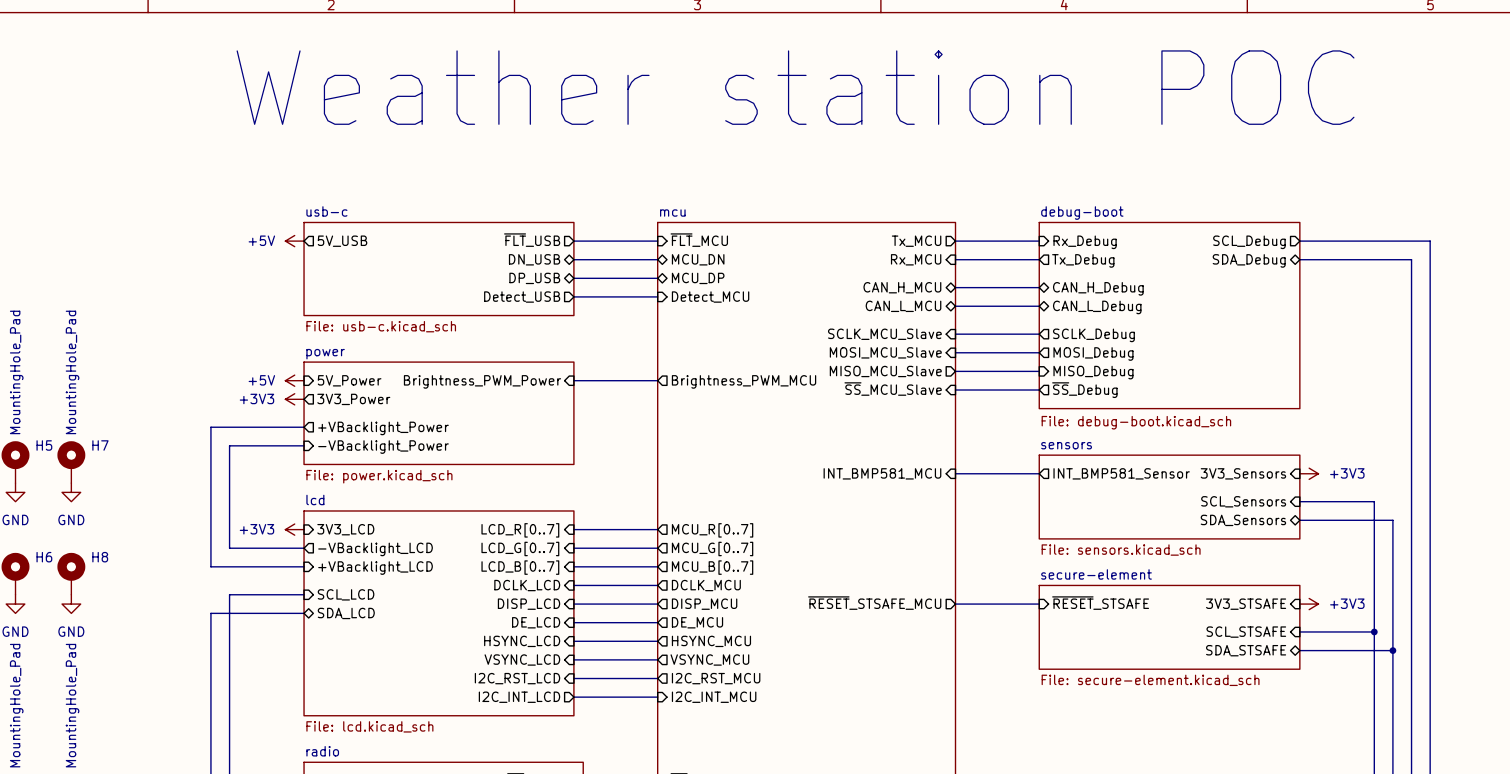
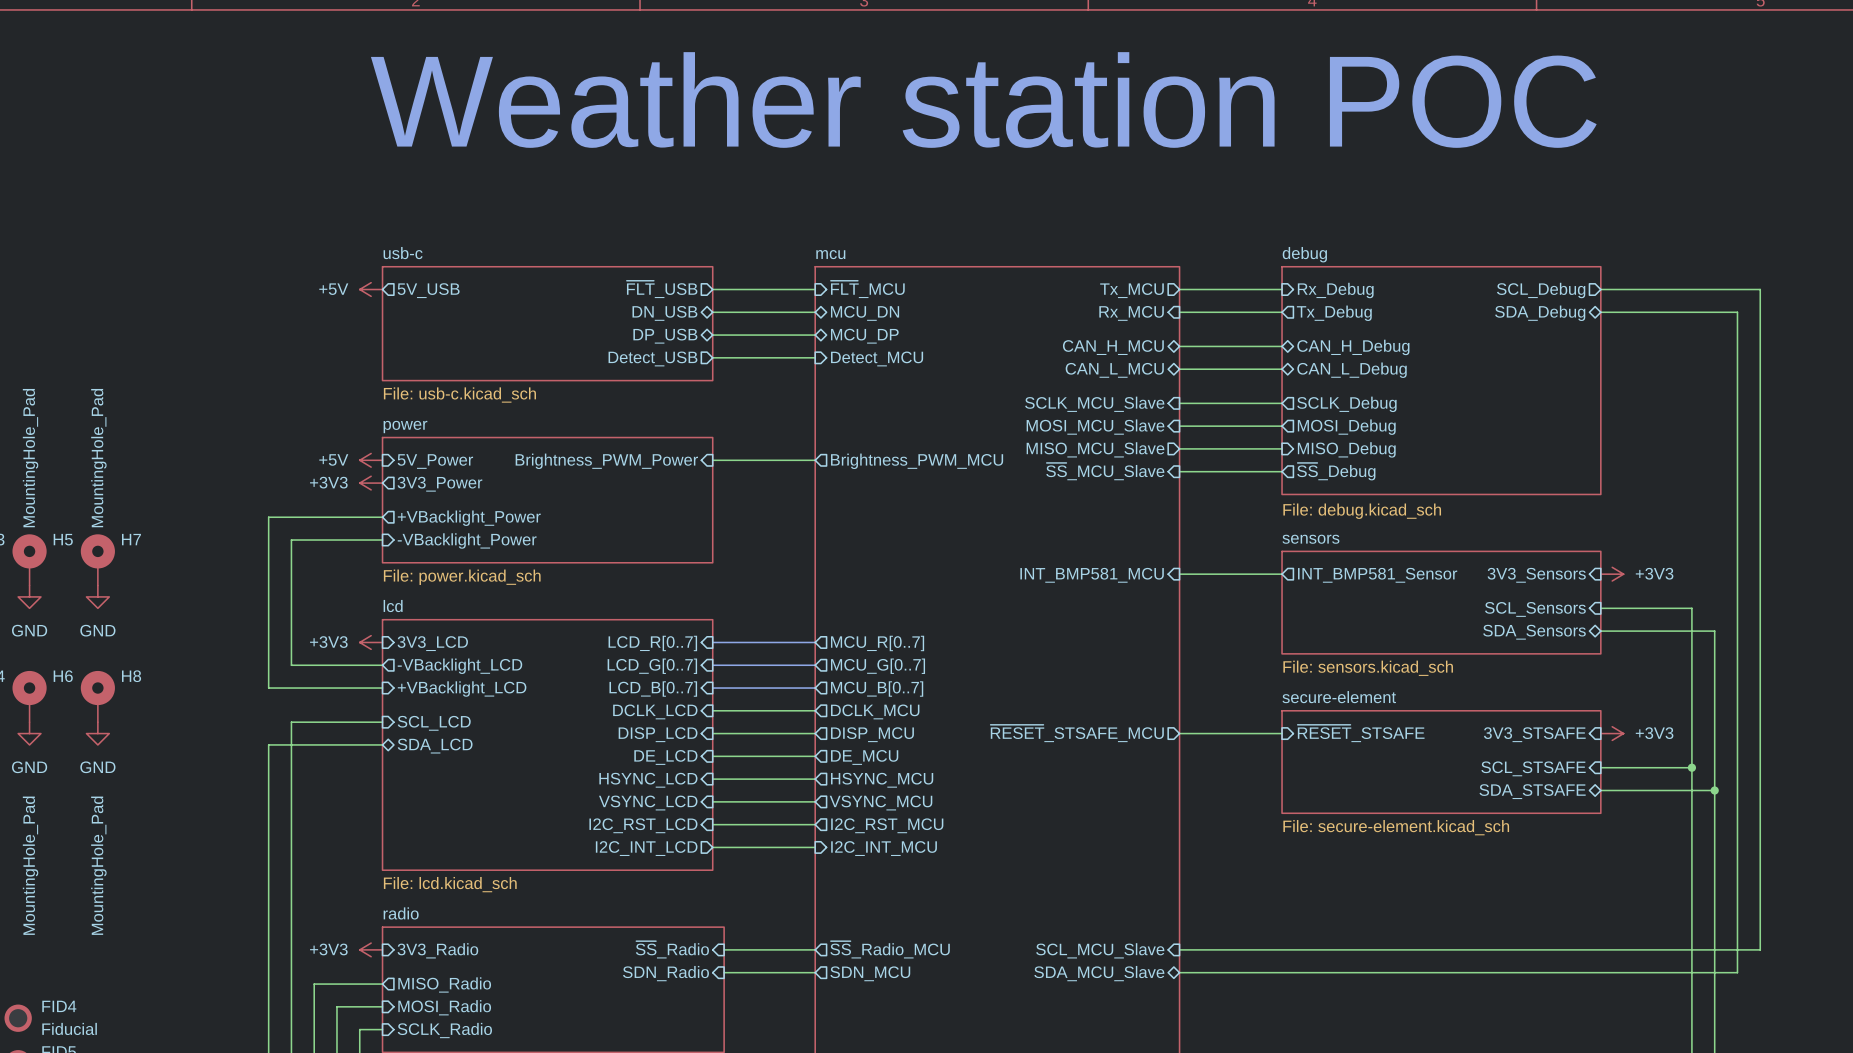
sheet debug-boot name: debug-boot (1082, 213) -> debug (1304, 254)
sheet debug-boot value: File: debug-boot.kicad_sch (1136, 422) -> File: debug.kicad_sch (1362, 511)

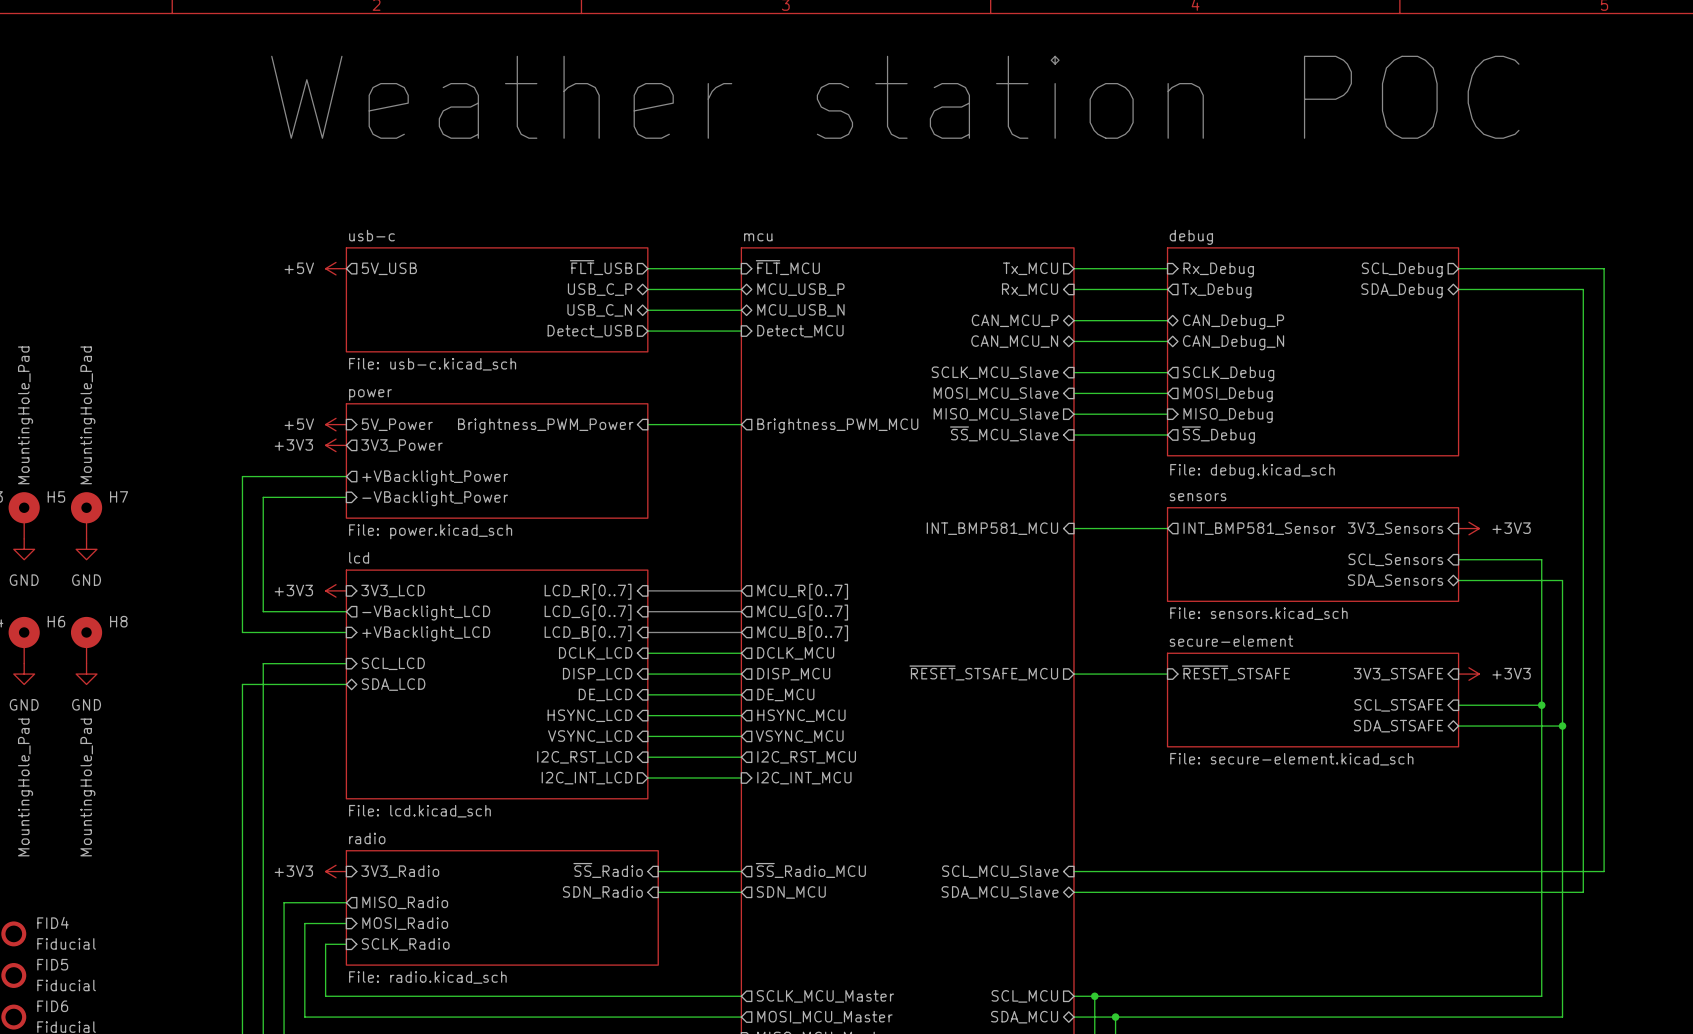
sheet pin: DN_USB (664, 313) -> USB_C_P (600, 289)
sheet pin: MCU_DN (865, 313) -> MCU_USB_P (800, 289)
sheet pin: DP_USB (665, 336) -> USB_C_N (599, 310)
sheet pin: MCU_DP (864, 336) -> MCU_USB_N (800, 310)
sheet pin: CAN_H_MCU (1113, 347) -> CAN_MCU_P (1015, 320)
sheet pin: CAN_H_Debug (1353, 347) -> CAN_Debug_P (1233, 322)
sheet pin: CAN_L_MCU (1114, 370) -> CAN_MCU_N (1014, 341)
sheet pin: CAN_L_Debug (1352, 370) -> CAN_Debug_N (1233, 342)

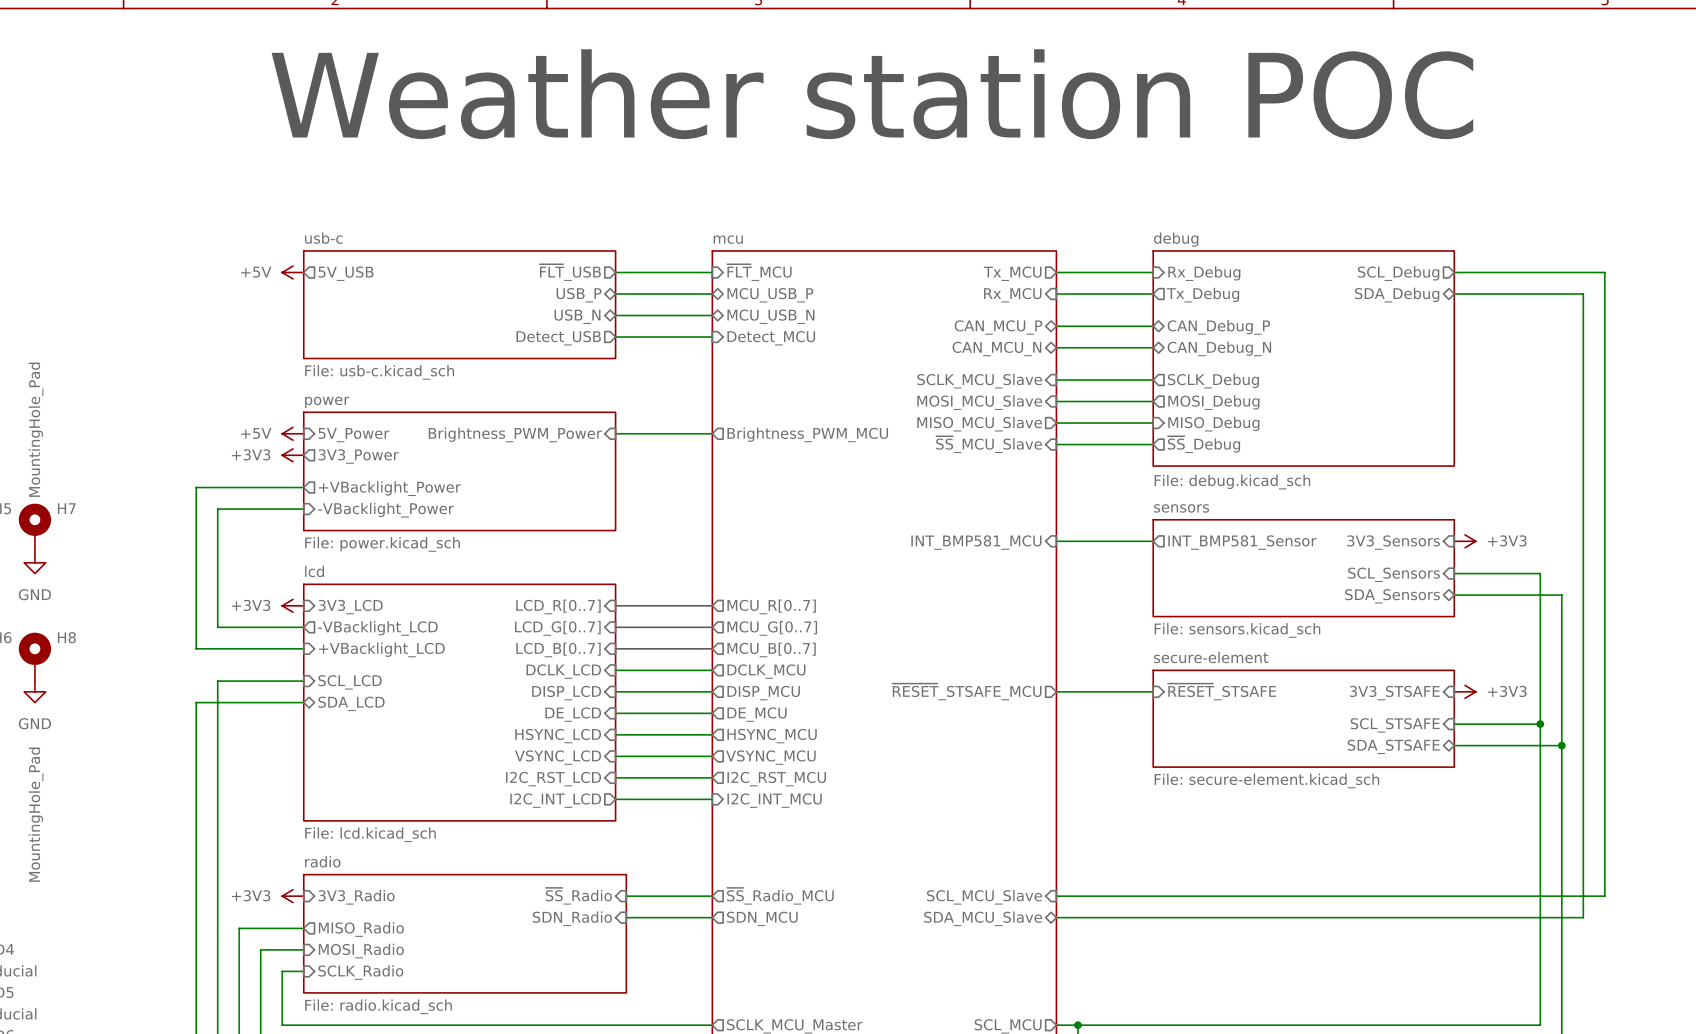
sheet pin: USB_C_P (600, 289) -> USB_P (579, 295)
sheet pin: USB_C_N (599, 310) -> USB_N (577, 316)

